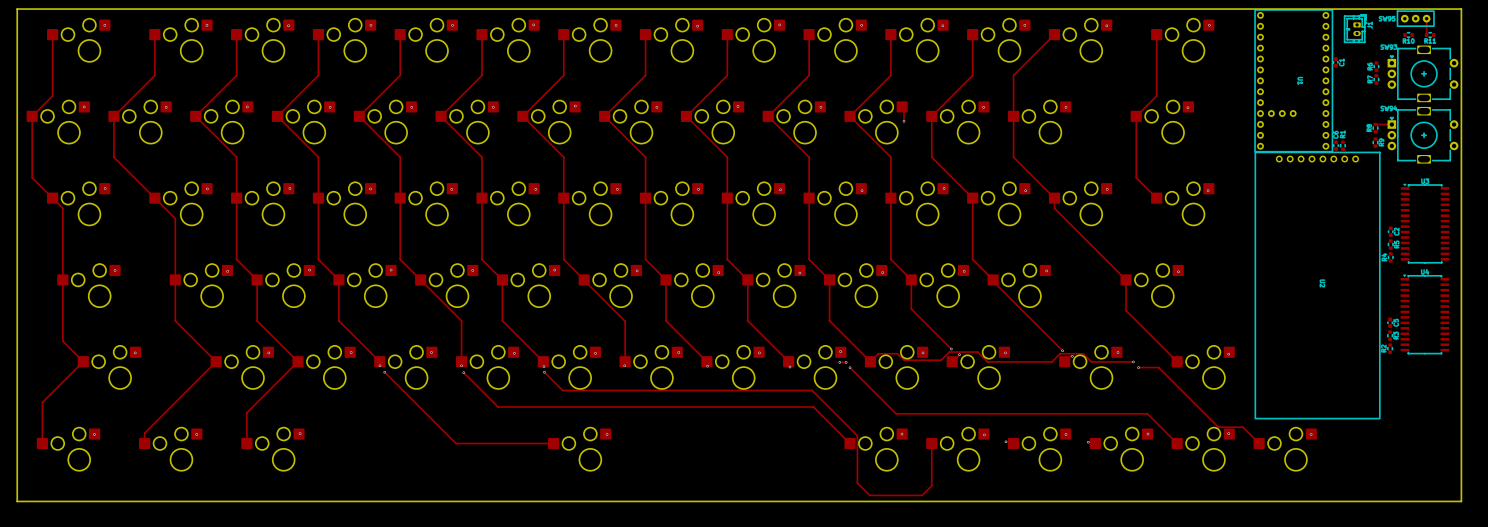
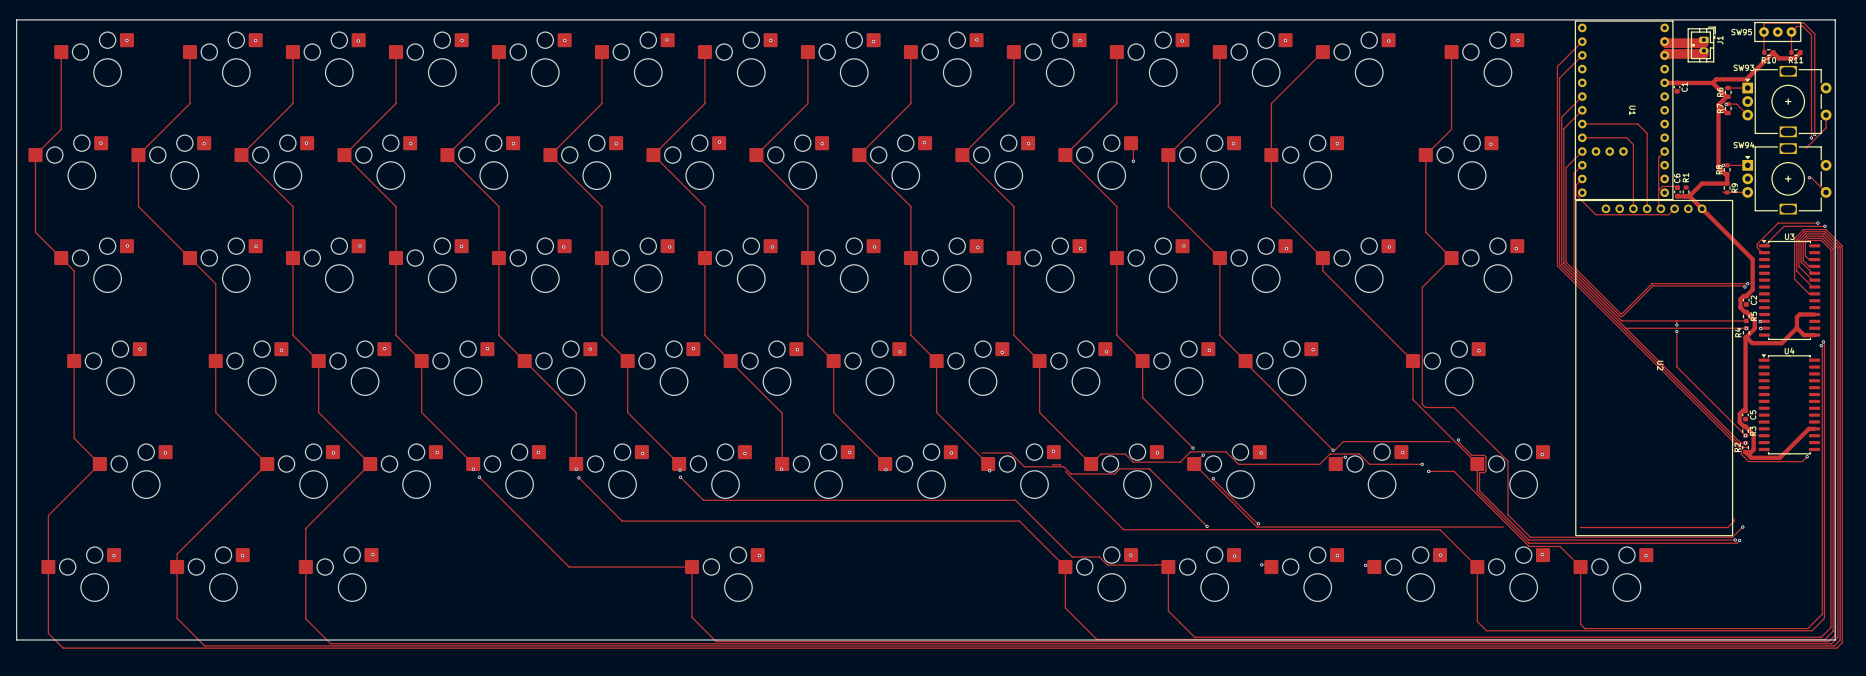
track: none -> (1791, 32) (1797, 26) (1802, 26) (1811, 35) (1811, 137)
track: none -> (1582, 41) (1557, 66) (1557, 265) (1741, 449)
track: none -> (1664, 41) (1703, 43)
track: none -> (1764, 52) (1764, 23) (1803, 23) (1814, 33) (1814, 134)
track: none -> (1800, 52) (1794, 58) (1779, 58) (1773, 52) (1746, 79) (1716, 79) (1712, 82)
track: none -> (1703, 53) (1664, 55)
track: none -> (1582, 55) (1559, 78) (1559, 264) (1742, 447)
track: none -> (1664, 82) (1712, 82)
track: none -> (1712, 82) (1726, 96)
track: none -> (1725, 88) (1747, 88)
track: none -> (1582, 96) (1561, 117) (1561, 263) (1740, 443) (1746, 442)
track: none -> (1726, 96) (1718, 104)
track: none -> (1718, 104) (1718, 167) (1727, 174) (1727, 183) (1701, 183) (1689, 196)
track: none -> (1718, 104) (1728, 113)
track: none -> (1726, 104) (1736, 104) (1747, 115)
via: none -> (1726, 104)
track: none -> (1582, 110) (1563, 128) (1563, 263) (1621, 320) (1746, 320)
track: none -> (1826, 115) (1826, 128) (1806, 148)
track: none -> (1582, 124) (1637, 124) (1647, 133) (1647, 208)
via: none -> (1814, 134)
track: none -> (1582, 137) (1626, 137) (1633, 144) (1633, 208)
via: none -> (1811, 138)
track: none -> (1582, 151) (1566, 167) (1566, 262) (1620, 316) (1652, 285) (1745, 286)
track: none -> (1664, 151) (1658, 157) (1658, 206) (1660, 208)
track: none -> (1582, 165) (1574, 173) (1574, 267) (1621, 314) (1652, 283) (1747, 283)
via: none -> (1723, 165)
track: none -> (1809, 177) (1826, 192)
via: none -> (1809, 177)
track: none -> (1582, 178) (1576, 184) (1576, 195) (1595, 214) (1668, 214) (1674, 208)
track: none -> (1677, 187) (1662, 186) (1658, 190)
track: none -> (1722, 191) (1747, 192)
track: none -> (1689, 196) (1752, 259) (1752, 289) (1740, 299) (1740, 307) (1754, 320) (1754, 328) (1745, 337) (1745, 410) (1739, 414) (1739, 422) (1753, 434) (1753, 449) (1750, 452) (1745, 452)
track: none -> (1689, 196) (1677, 196)
track: none -> (1817, 223) (1778, 223) (1757, 243) (1757, 247) (1764, 252)
via: none -> (1817, 223)
track: none -> (1825, 226) (1783, 226) (1764, 245)
via: none -> (1825, 226)
track: none -> (1451, 258) (1422, 287) (1422, 404) (1425, 407) (1454, 407) (1508, 461) (1508, 514) (1530, 537) (1732, 537) (1742, 527)
track: none -> (1814, 259) (1809, 259) (1805, 255) (1805, 243) (1808, 240) (1821, 240) (1830, 249) (1830, 627) (1821, 637) (1194, 637) (1168, 611)
track: none -> (1814, 266) (1809, 266) (1803, 260) (1803, 242) (1807, 238) (1822, 238) (1833, 249) (1833, 631) (1825, 639) (1096, 639) (1065, 608) (1065, 567)
track: none -> (1814, 273) (1801, 261) (1801, 241) (1806, 236) (1823, 236) (1835, 248) (1835, 635) (1828, 641) (716, 641) (692, 617) (692, 567)
track: none -> (1814, 280) (1798, 266) (1798, 240) (1805, 233) (1824, 233) (1837, 247) (1837, 637) (1831, 643) (330, 643) (305, 618) (305, 567)
via: none -> (1747, 283)
via: none -> (1745, 286)
track: none -> (1814, 287) (1796, 271) (1796, 239) (1804, 231) (1824, 231) (1840, 246) (1840, 640) (1834, 645) (204, 645) (177, 618) (177, 567)
track: none -> (1814, 293) (1809, 293) (1794, 279) (1794, 238) (1803, 229) (1825, 229) (1842, 245) (1842, 642) (1836, 648) (63, 648) (48, 633) (48, 567)
track: none -> (1814, 314) (1799, 314) (1796, 317) (1796, 328)
track: none -> (1676, 320) (1676, 325)
via: none -> (1760, 321)
via: none -> (1676, 325)
track: none -> (1626, 328) (1746, 328)
via: none -> (1746, 328)
track: none -> (1796, 328) (1781, 343) (1752, 343) (1746, 337)
track: none -> (1796, 328) (1803, 335) (1814, 335)
via: none -> (1760, 328)
track: none -> (1676, 331) (1676, 366) (1745, 435)
via: none -> (1676, 331)
track: none -> (1823, 341) (1824, 618) (1812, 630) (1486, 630) (1477, 621) (1477, 567)
via: none -> (1823, 341)
track: none -> (1821, 345) (1822, 614) (1807, 628) (1584, 628) (1580, 624) (1580, 567)
via: none -> (1821, 345)
track: none -> (1814, 428) (1808, 428) (1779, 457) (1751, 457) (1745, 452)
via: none -> (1745, 435)
track: none -> (1458, 439) (1471, 455) (1485, 456) (1485, 471) (1479, 472) (1479, 490) (1528, 539) (1735, 539)
via: none -> (1458, 439)
track: none -> (1449, 441) (1343, 441) (1333, 450)
via: none -> (1745, 443)
track: none -> (1742, 447) (1748, 447)
track: none -> (1741, 449) (1741, 454) (1748, 461) (1802, 461) (1807, 456)
track: none -> (981, 452) (1010, 452) (1024, 466) (1063, 466) (1071, 474) (1114, 474) (1119, 468) (1149, 468) (1207, 526)
via: none -> (1807, 456)
track: none -> (1194, 464) (1257, 527) (1503, 527)
track: none -> (1477, 464) (1477, 491) (1529, 543) (1736, 543) (1739, 540)
via: (839, 362) -> none
via: (846, 362) -> none
via: (850, 367) -> none
track: none -> (1213, 478) (1258, 523)
via: none -> (1213, 478)
track: (810, 390) (857, 435) (857, 483) (869, 495) (922, 495) (931, 485) (931, 478) -> (1015, 500) (1072, 557) (1099, 557) (1107, 565) (1166, 564) (1168, 567)
track: none -> (1734, 518) (1734, 521) (1727, 527) (1580, 527)
via: none -> (1258, 523)
via: none -> (1207, 526)
via: none -> (1742, 527)
via: none -> (1735, 539)
via: none -> (1739, 540)

